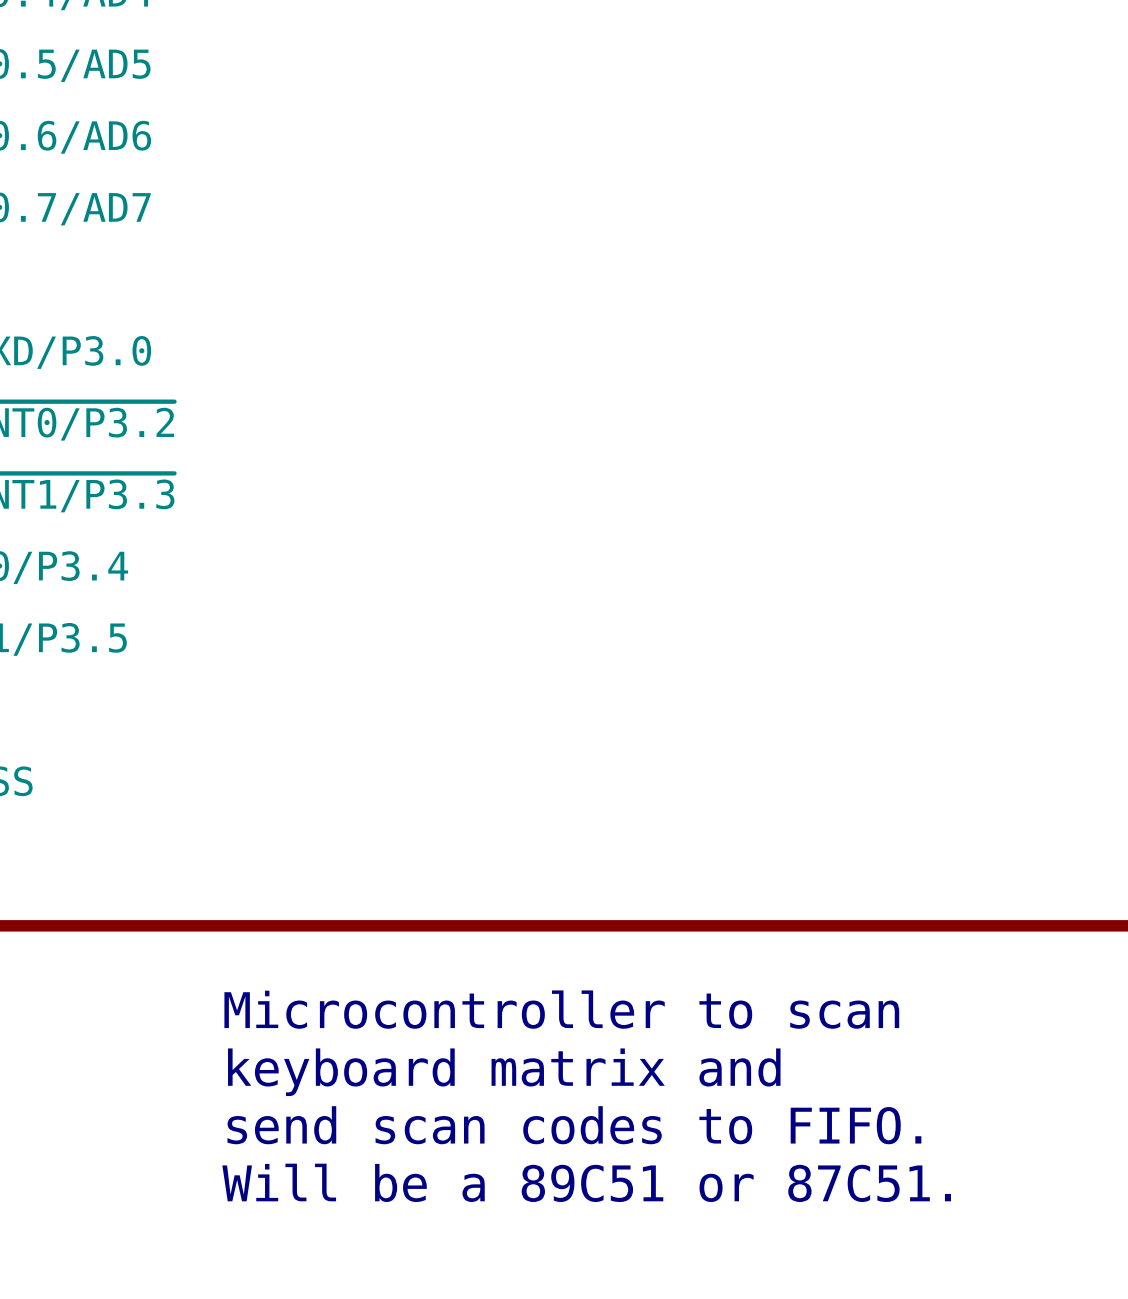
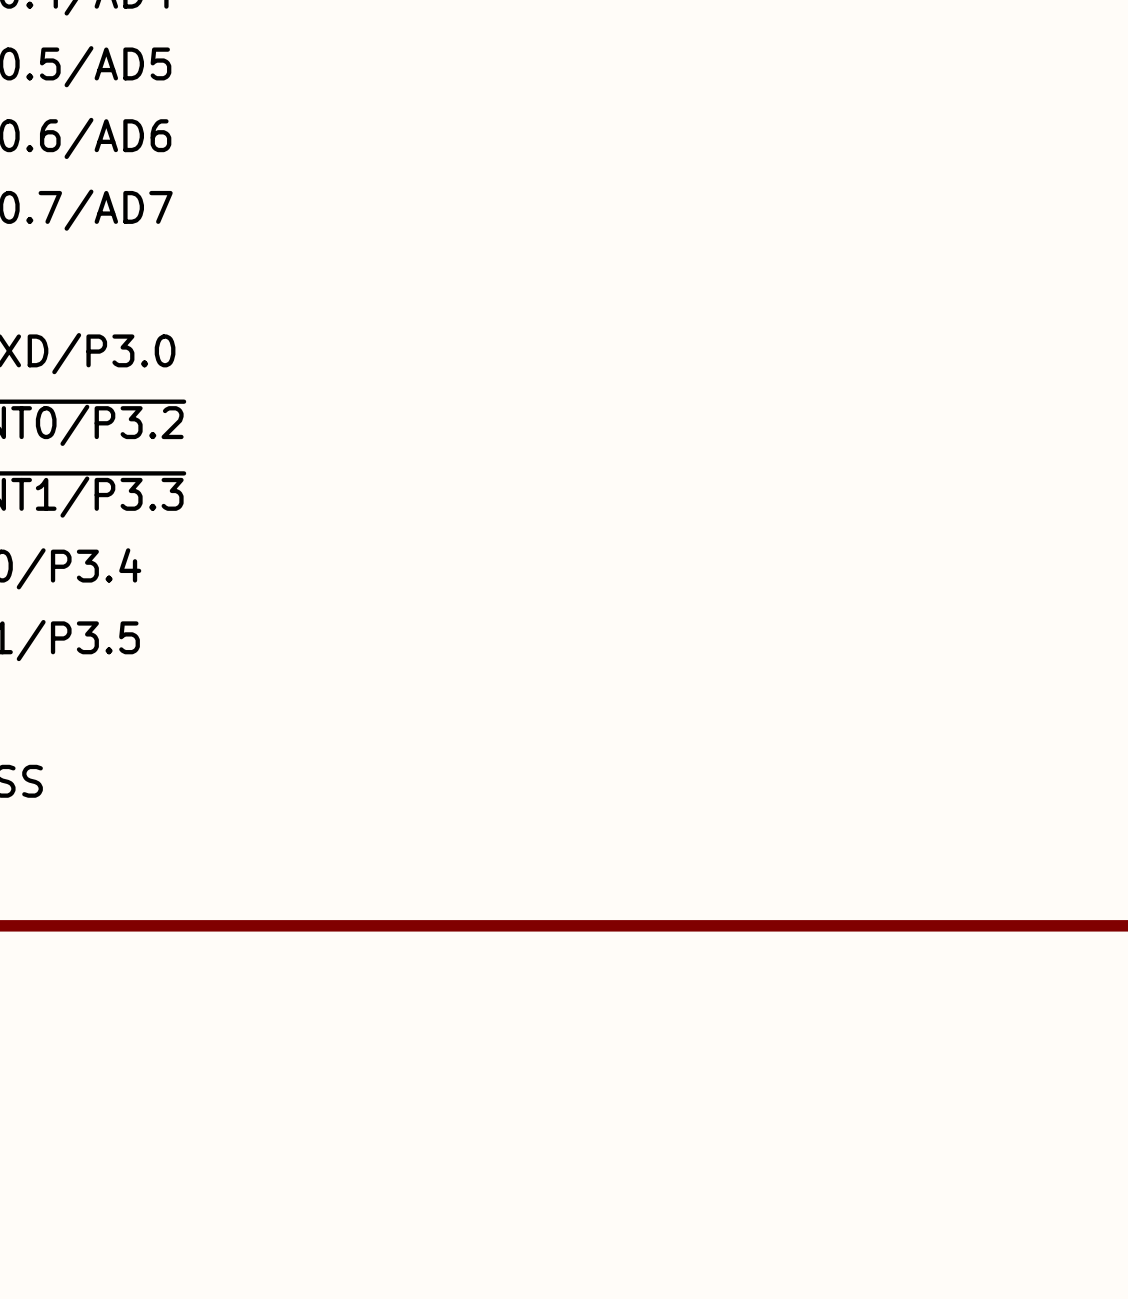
text: Microcontroller to scan (561, 1009) -> none
text: keyboard matrix and (504, 1072) -> none
text: send scan codes to FIFO. (574, 1125) -> none
text: Will be a 89C51 or 87C51. (586, 1182) -> none

